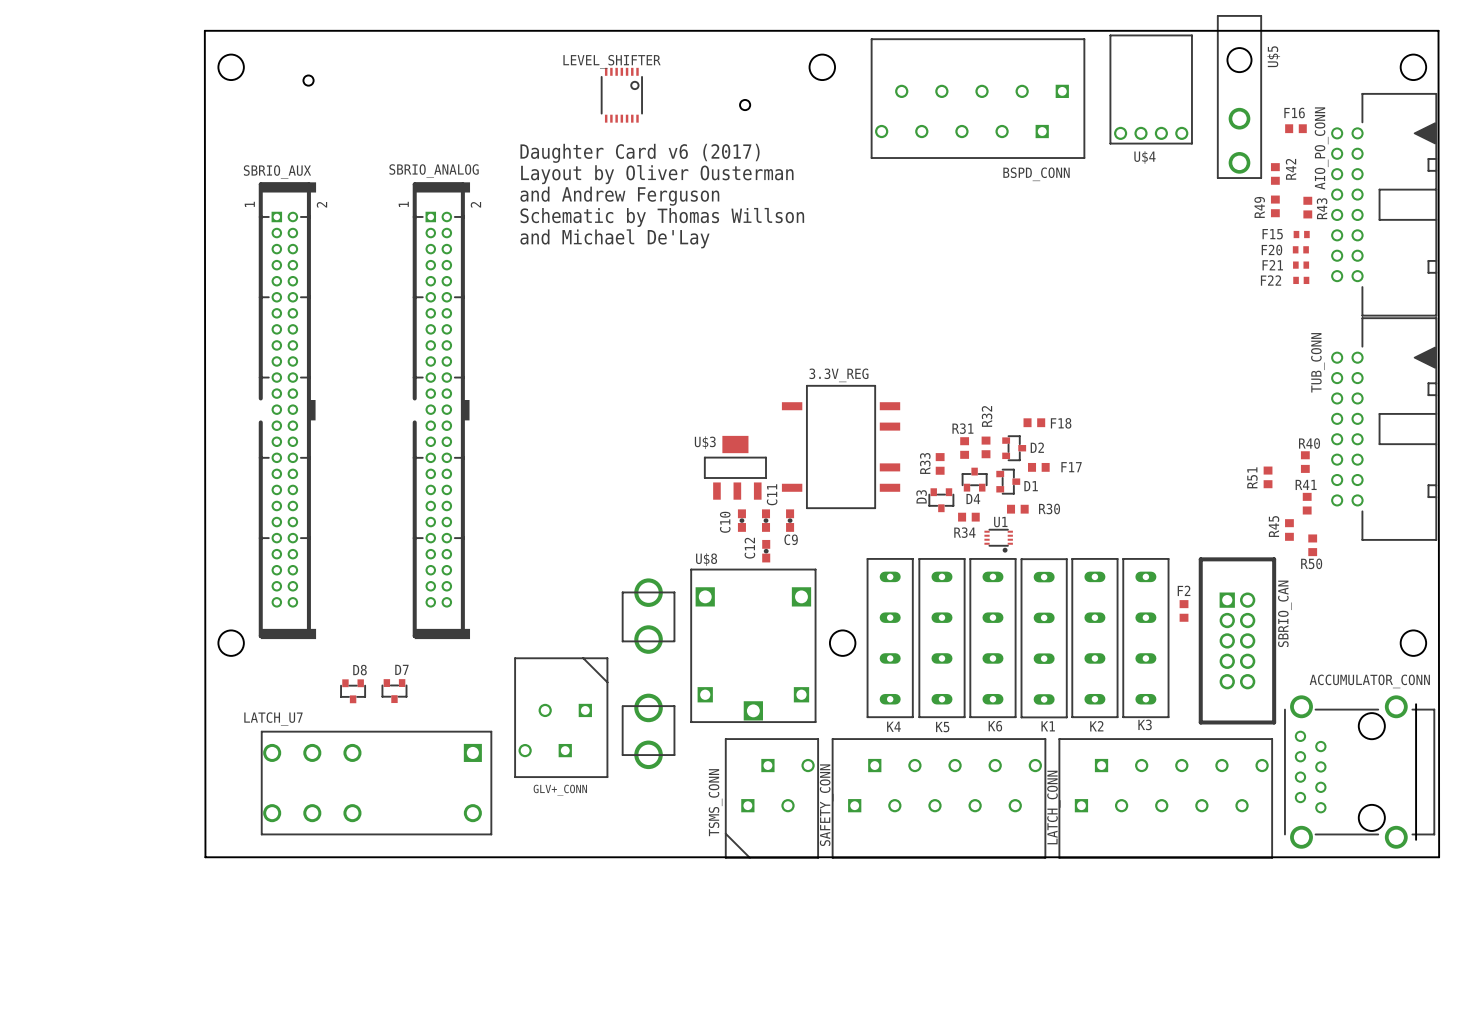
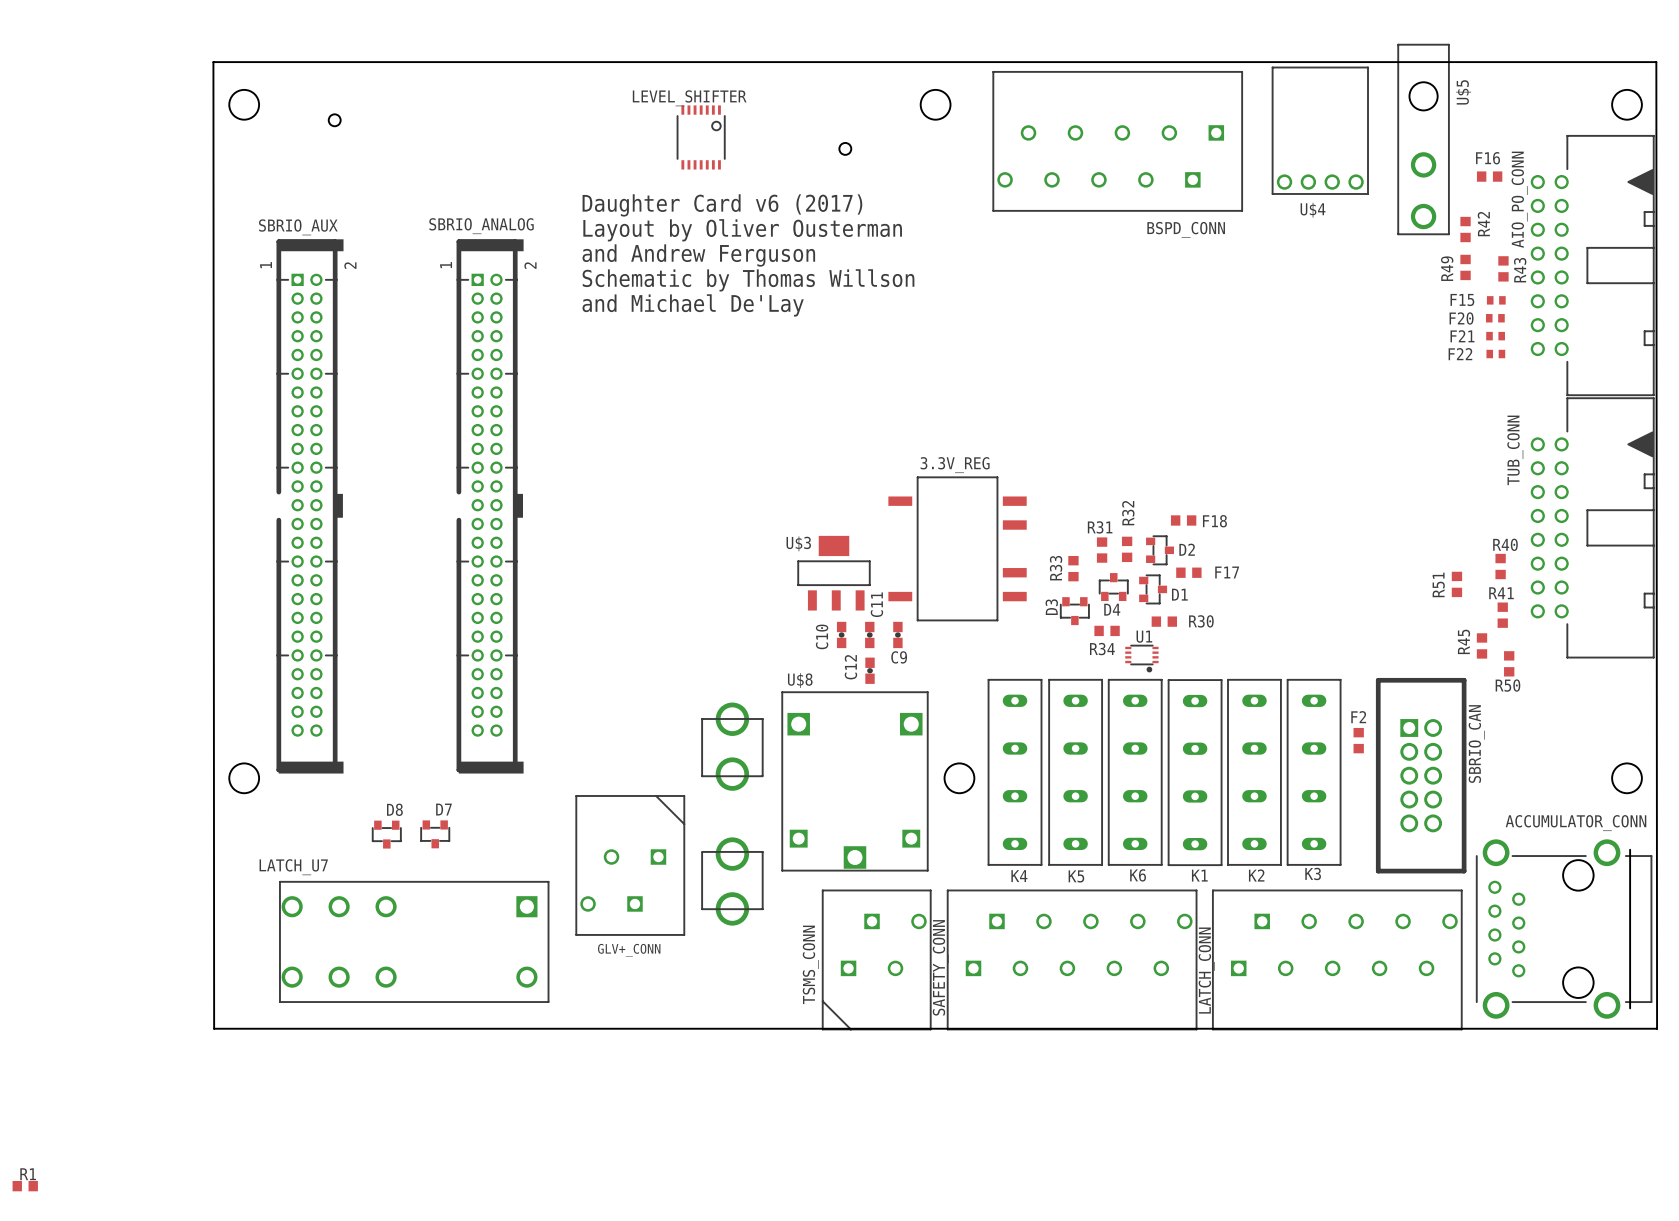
R1: none -> (25, 1186)

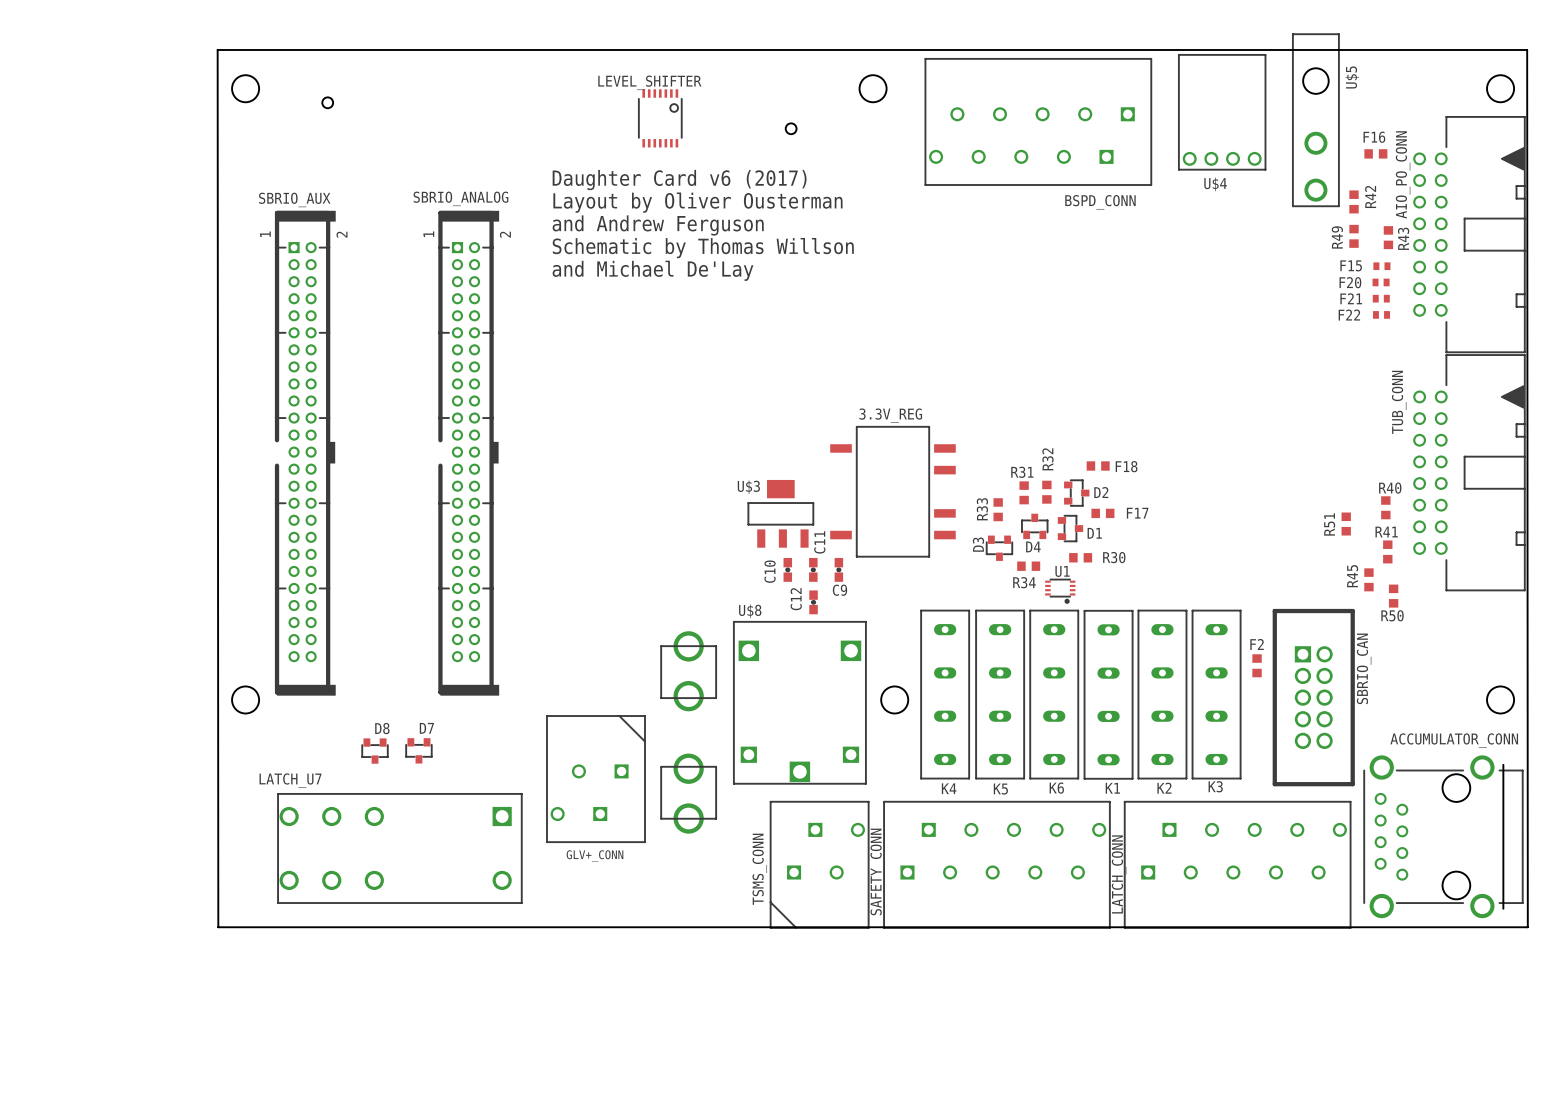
R1: (25, 1186) -> none

